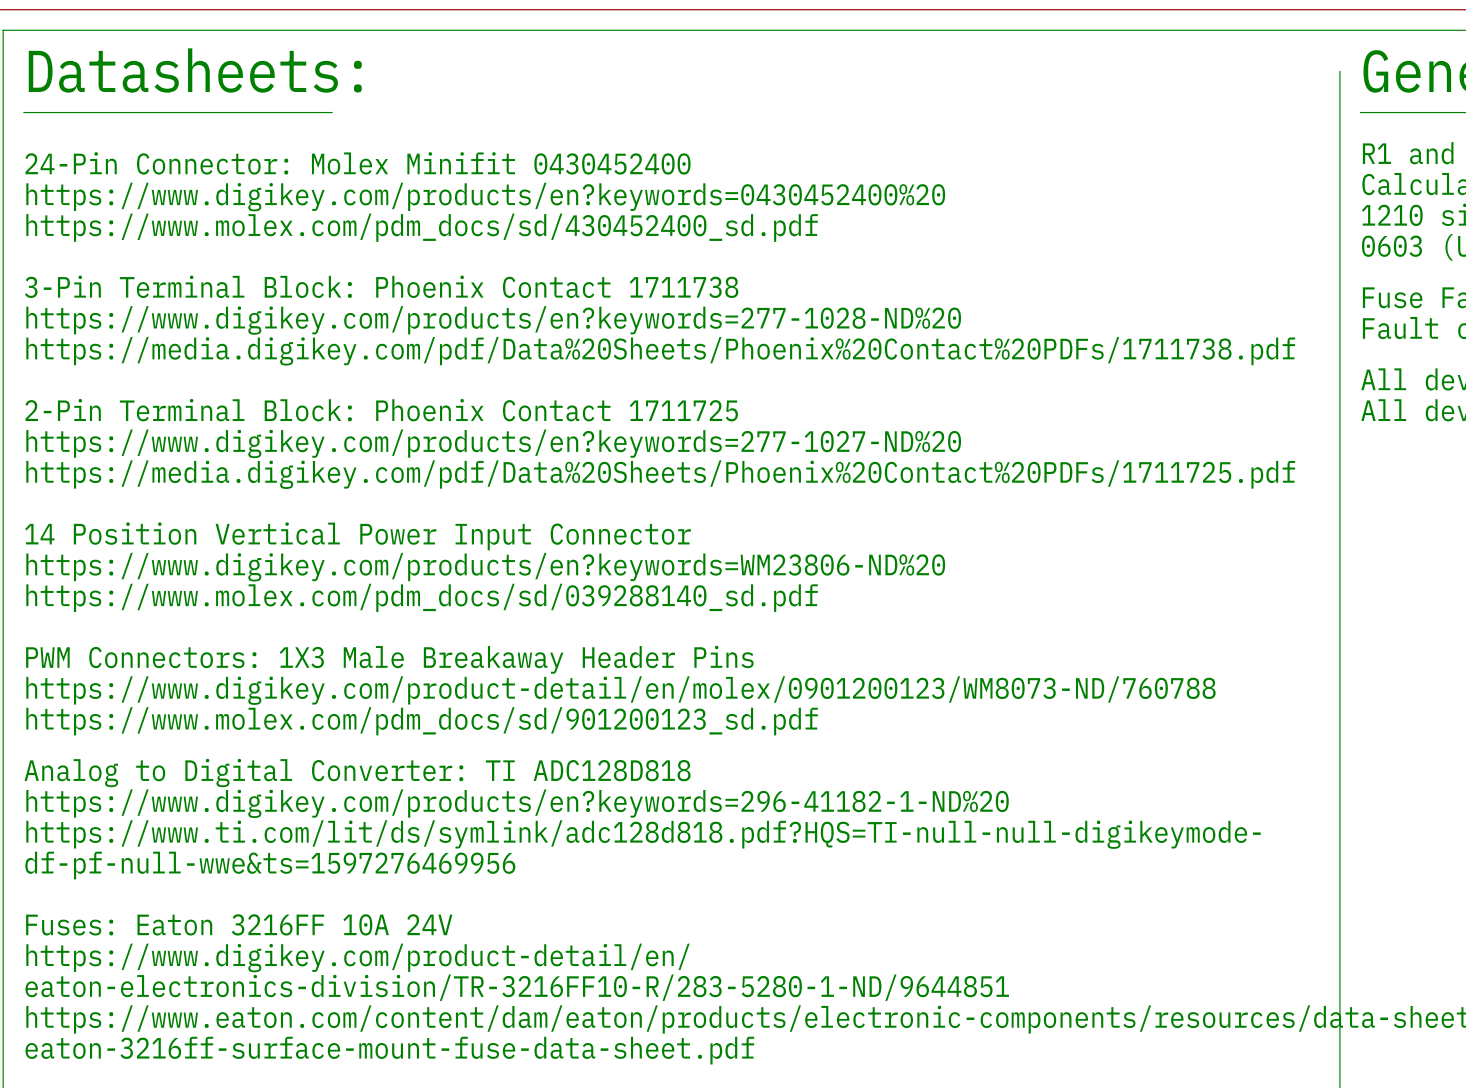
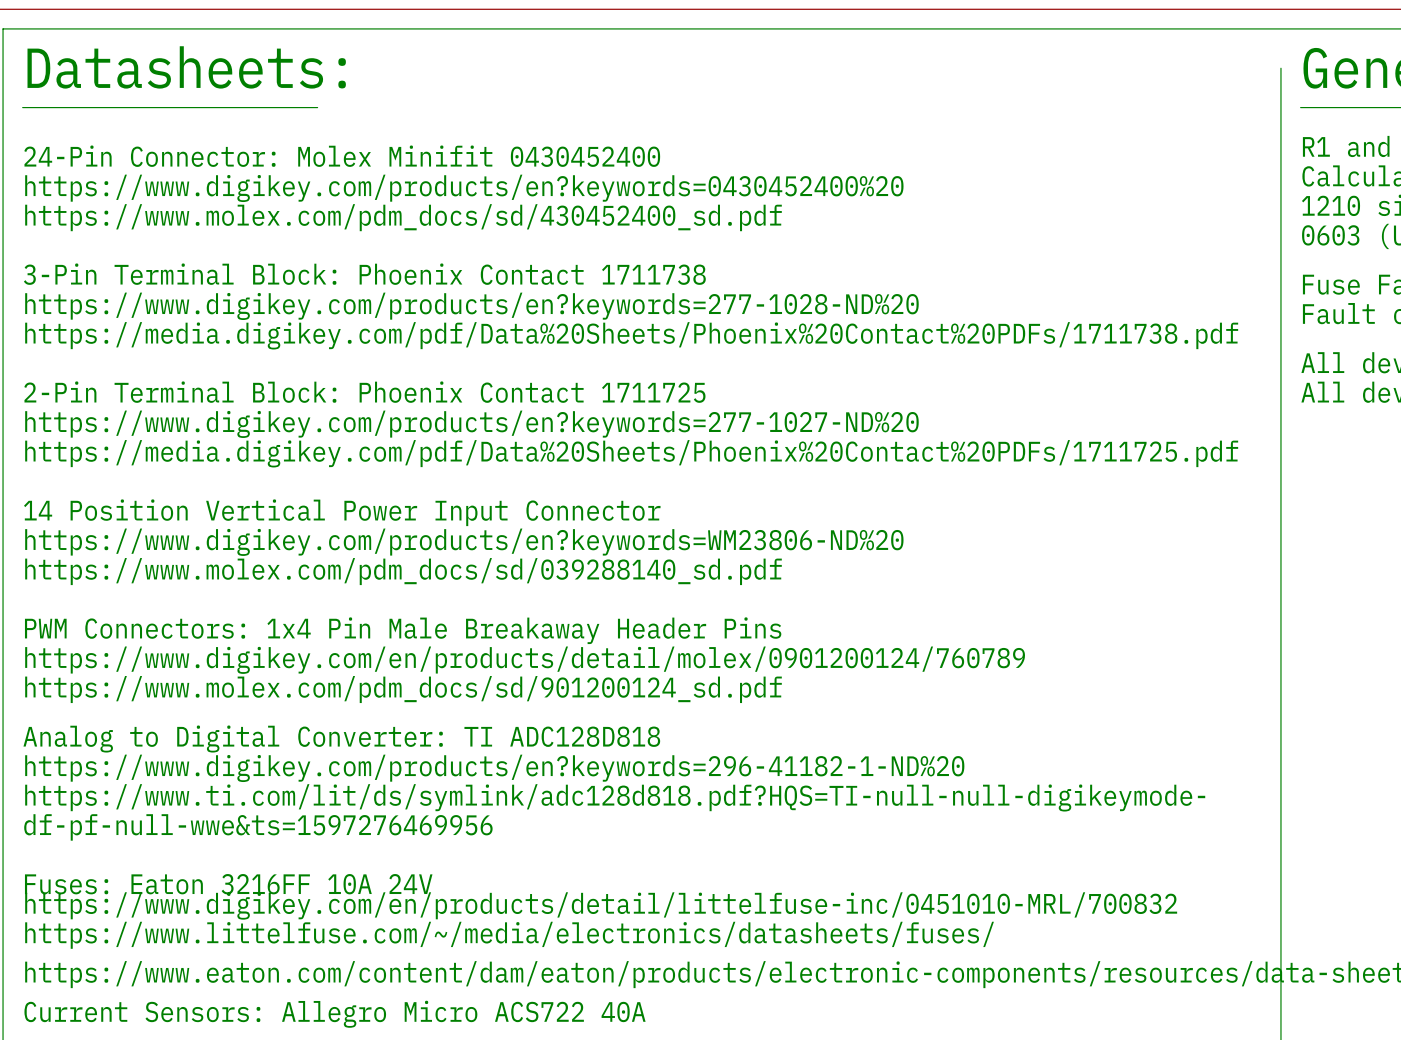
text: PWM Connectors: 1X3 Male Breakaway Header Pins (389, 659) -> PWM Connectors: 1x4 Pin Male Breakaway Header Pins (403, 630)
text: https://www.digikey.com/product-detail/en/molex/0901200123/WM8073-ND/760788 (620, 690) -> https://www.digikey.com/en/products/detail/molex/0901200124/760789 (525, 660)
text: https://www.molex.com/pdm_docs/sd/901200123_sd.pdf (422, 721) -> https://www.molex.com/pdm_docs/sd/901200124_sd.pdf (403, 689)
text: https://www.digikey.com/product-detail/en/ (357, 957) -> https://www.digikey.com/en/products/detail/littelfuse-inc/0451010-MRL/700832 (601, 905)
text: none -> https://www.littelfuse.com/~/media/electronics/datasheets/fuses/ (509, 935)
text: eaton-electronics-division/TR-3216FF10-R/283-5280-1-ND/9644851 (517, 987) -> none
text: eaton-3216ff-surface-mount-fuse-data-sheet.pdf (389, 1050) -> none
text: none -> Current Sensors: Allegro Micro ACS722 40A (335, 1014)

